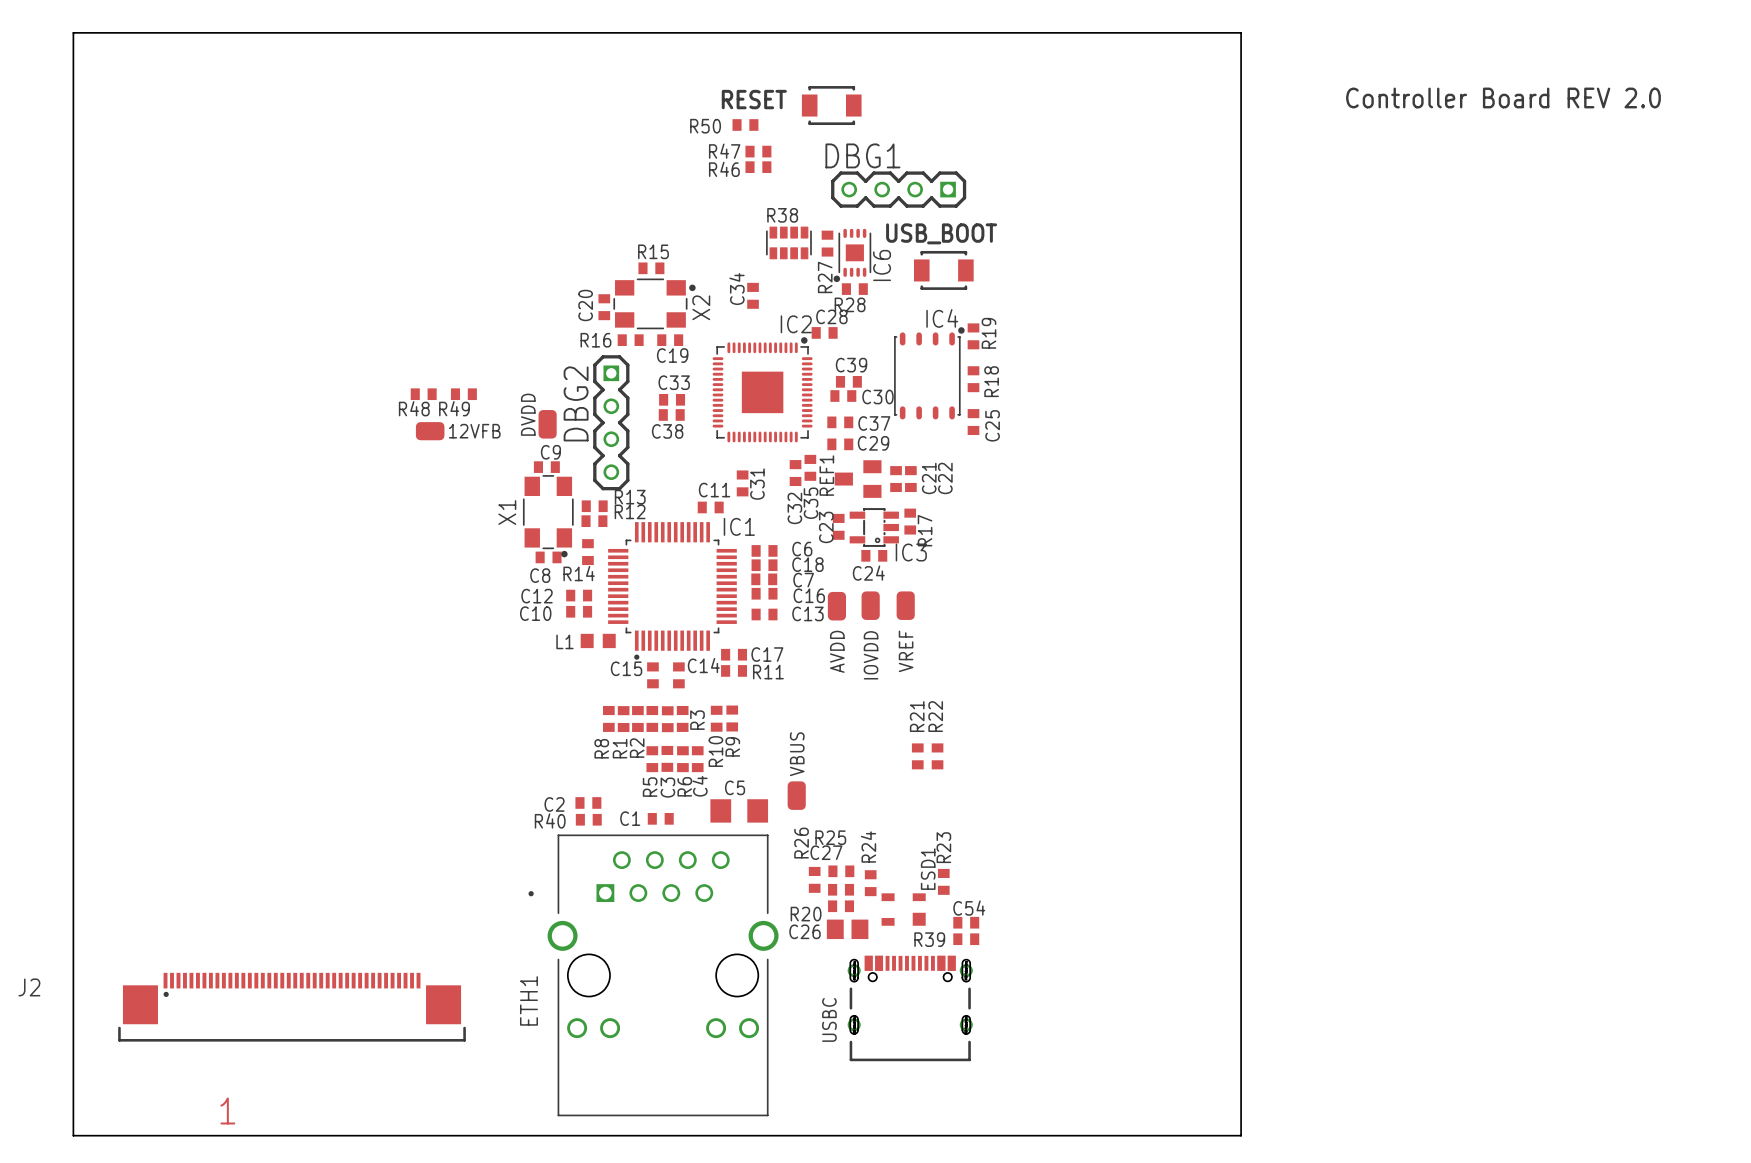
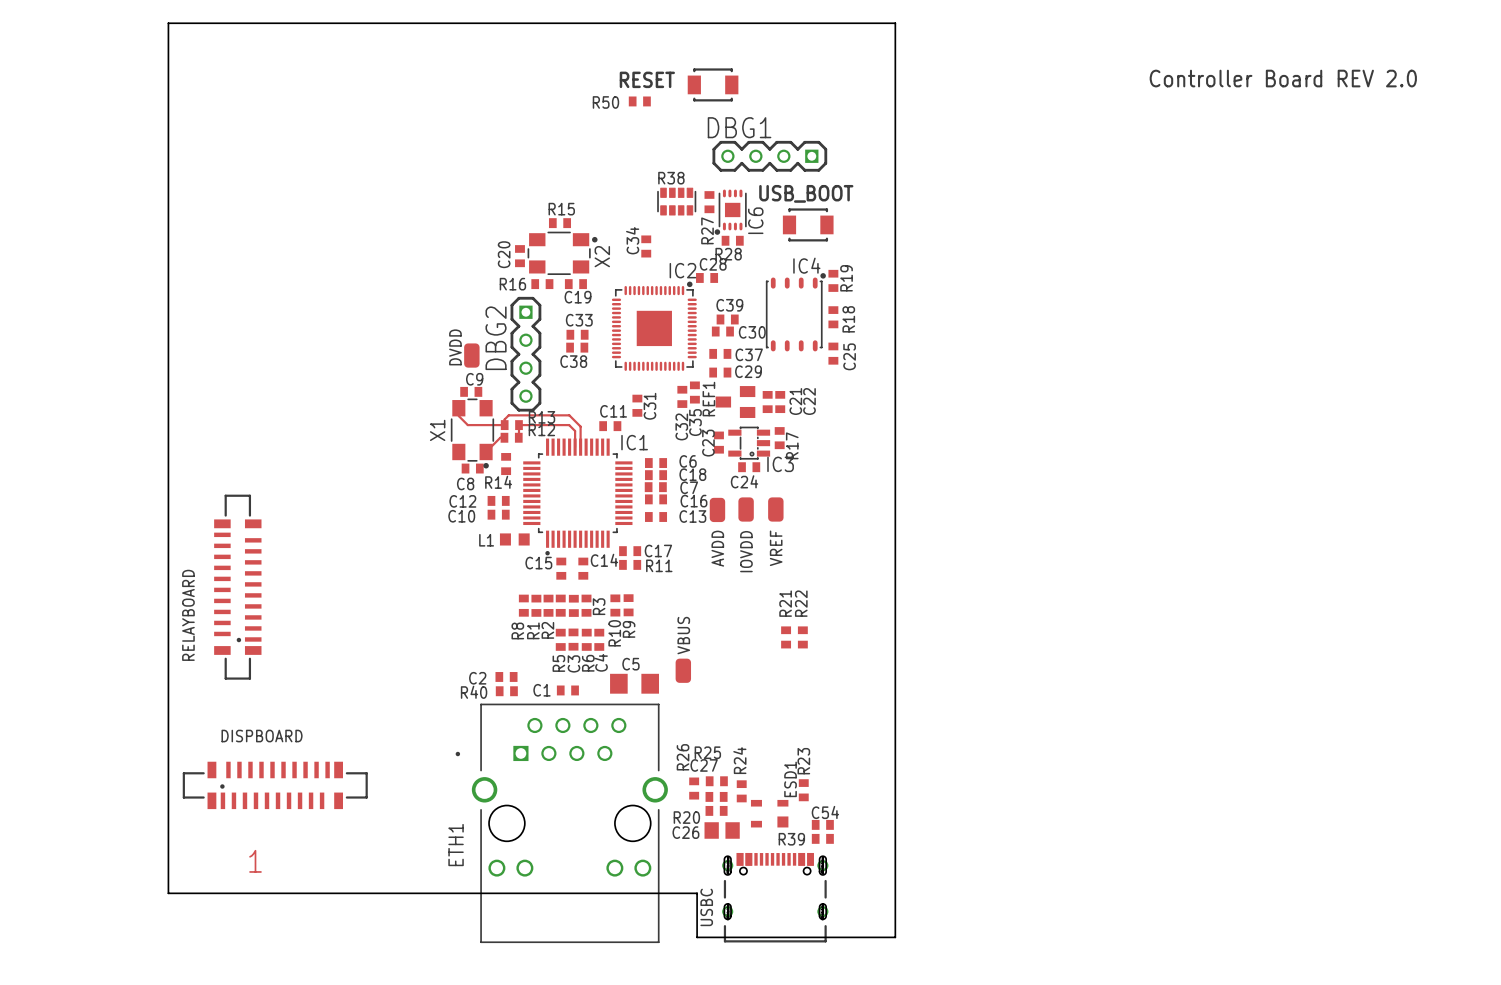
board edge: (190, 32) (73, 32) (73, 1135) (1241, 1135) (1241, 32) (1046, 32) -> (168, 23) (168, 893) (697, 893) (697, 937) (895, 937) (895, 23)
R47: (758, 151) -> none
R46: (758, 167) -> none
R48: (423, 394) -> none
R49: (463, 394) -> none
12VFB: (430, 431) -> none
track: none -> (458, 408) (458, 416) (467, 425) (504, 425) (504, 419) (508, 415) (569, 415) (580, 426) (580, 447)
track: none -> (504, 437) (500, 437) (486, 451)
track: none -> (518, 437) (518, 425) (569, 425) (575, 431) (575, 447)
RELAYBOARD: none -> (237, 587)
R25 position: (841, 871) -> (716, 781)
R26 position: (814, 879) -> (694, 788)
R23 position: (943, 881) -> (803, 790)
R24 position: (870, 883) -> (741, 791)
C27 position: (841, 889) -> (716, 796)
R20 position: (841, 906) -> (716, 810)
ESD1 position: (903, 909) -> (769, 813)
C54 position: (966, 922) -> (822, 824)
C26 position: (847, 929) -> (722, 830)
DISPBOARD: none -> (275, 785)
R39 position: (966, 939) -> (822, 838)
J2: (292, 1007) -> none
USBC position: (910, 1008) -> (775, 897)
drawing position: (227, 1110) -> (255, 861)

